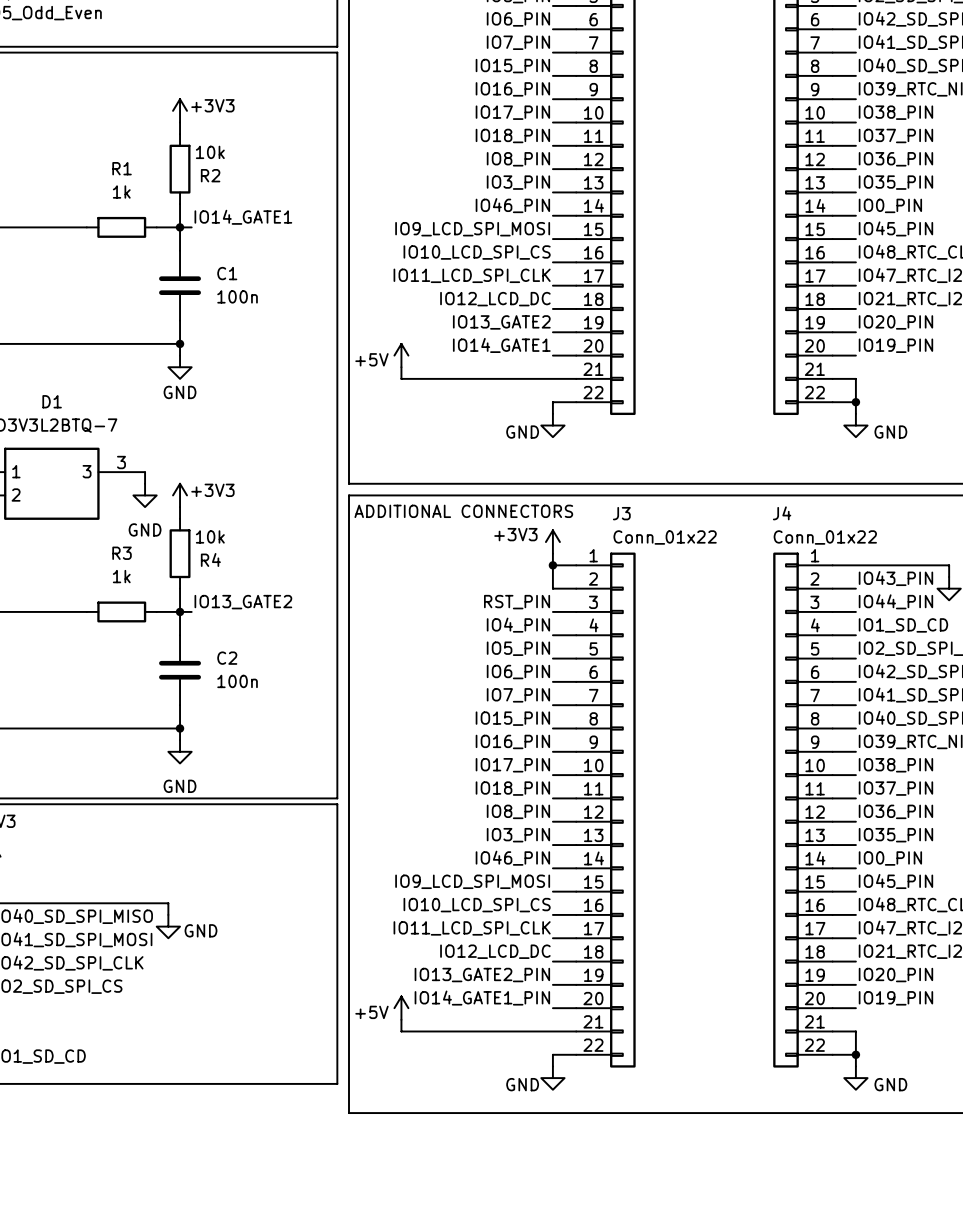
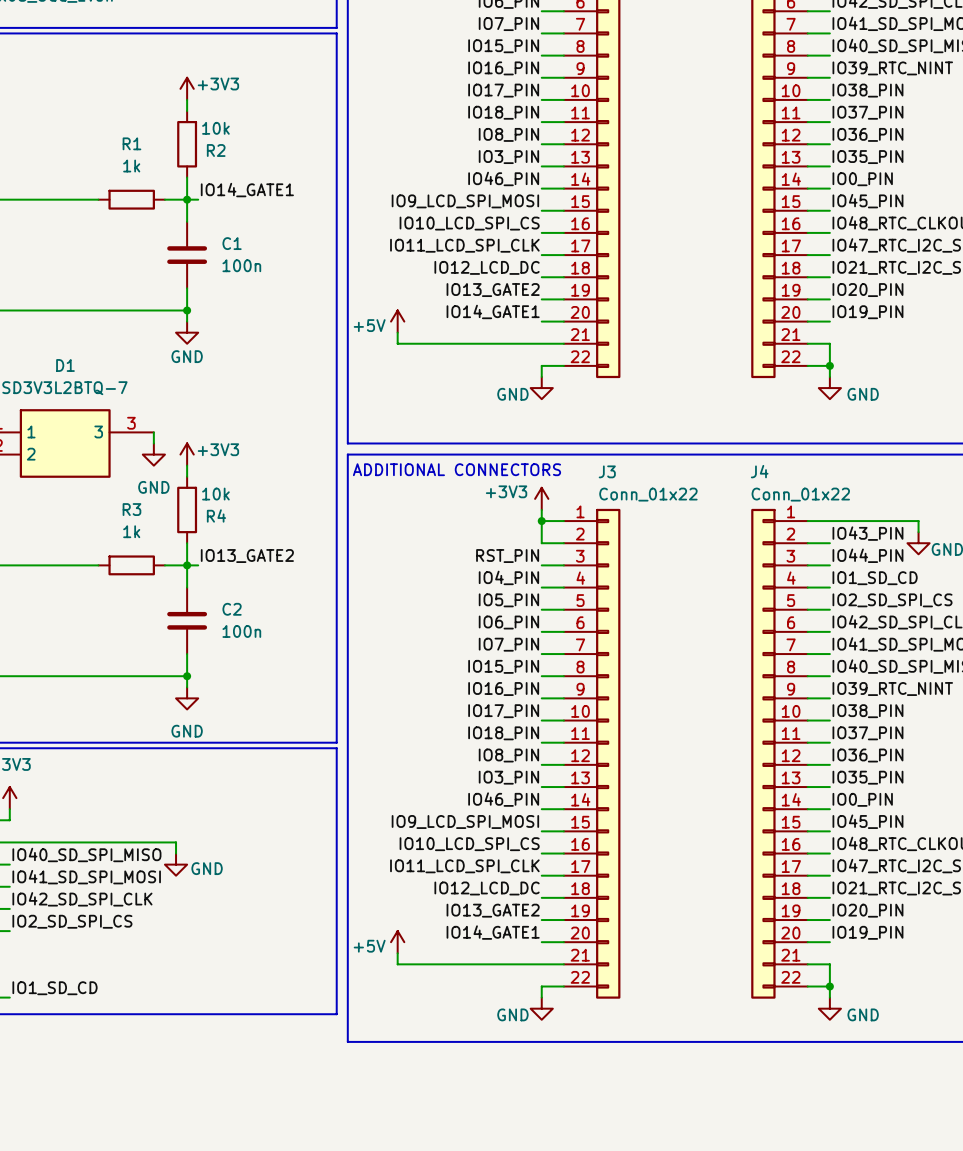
label: IO13_GATE2_PIN (482, 975) -> IO13_GATE2 (493, 910)
label: IO14_GATE1_PIN (482, 998) -> IO14_GATE1 (493, 932)

